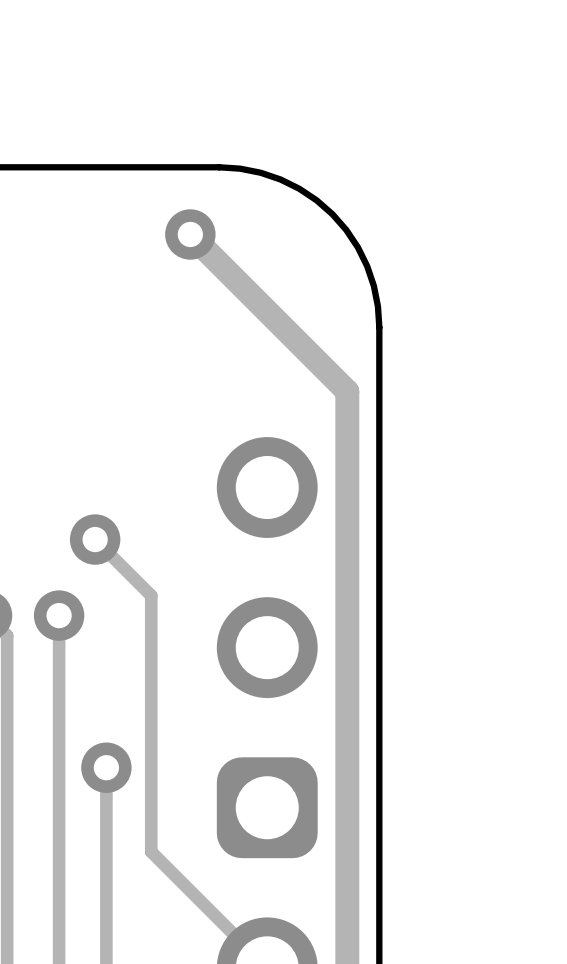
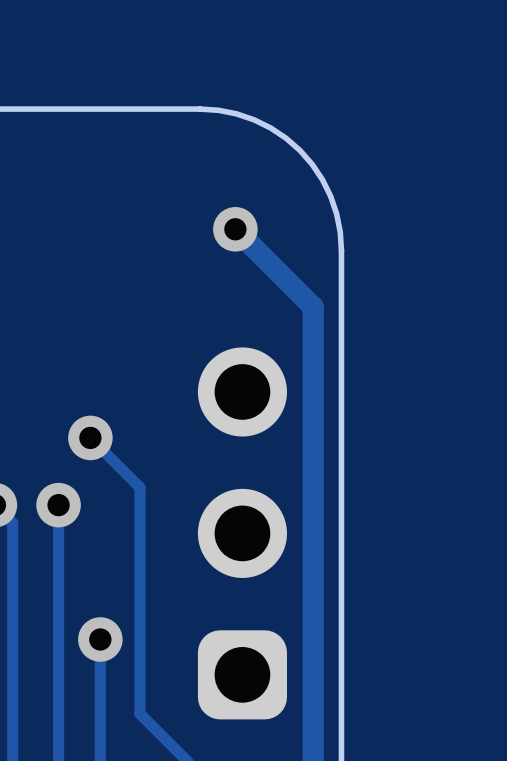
track: (190, 234) (259, 303) -> none
via position: (190, 234) -> (235, 229)

